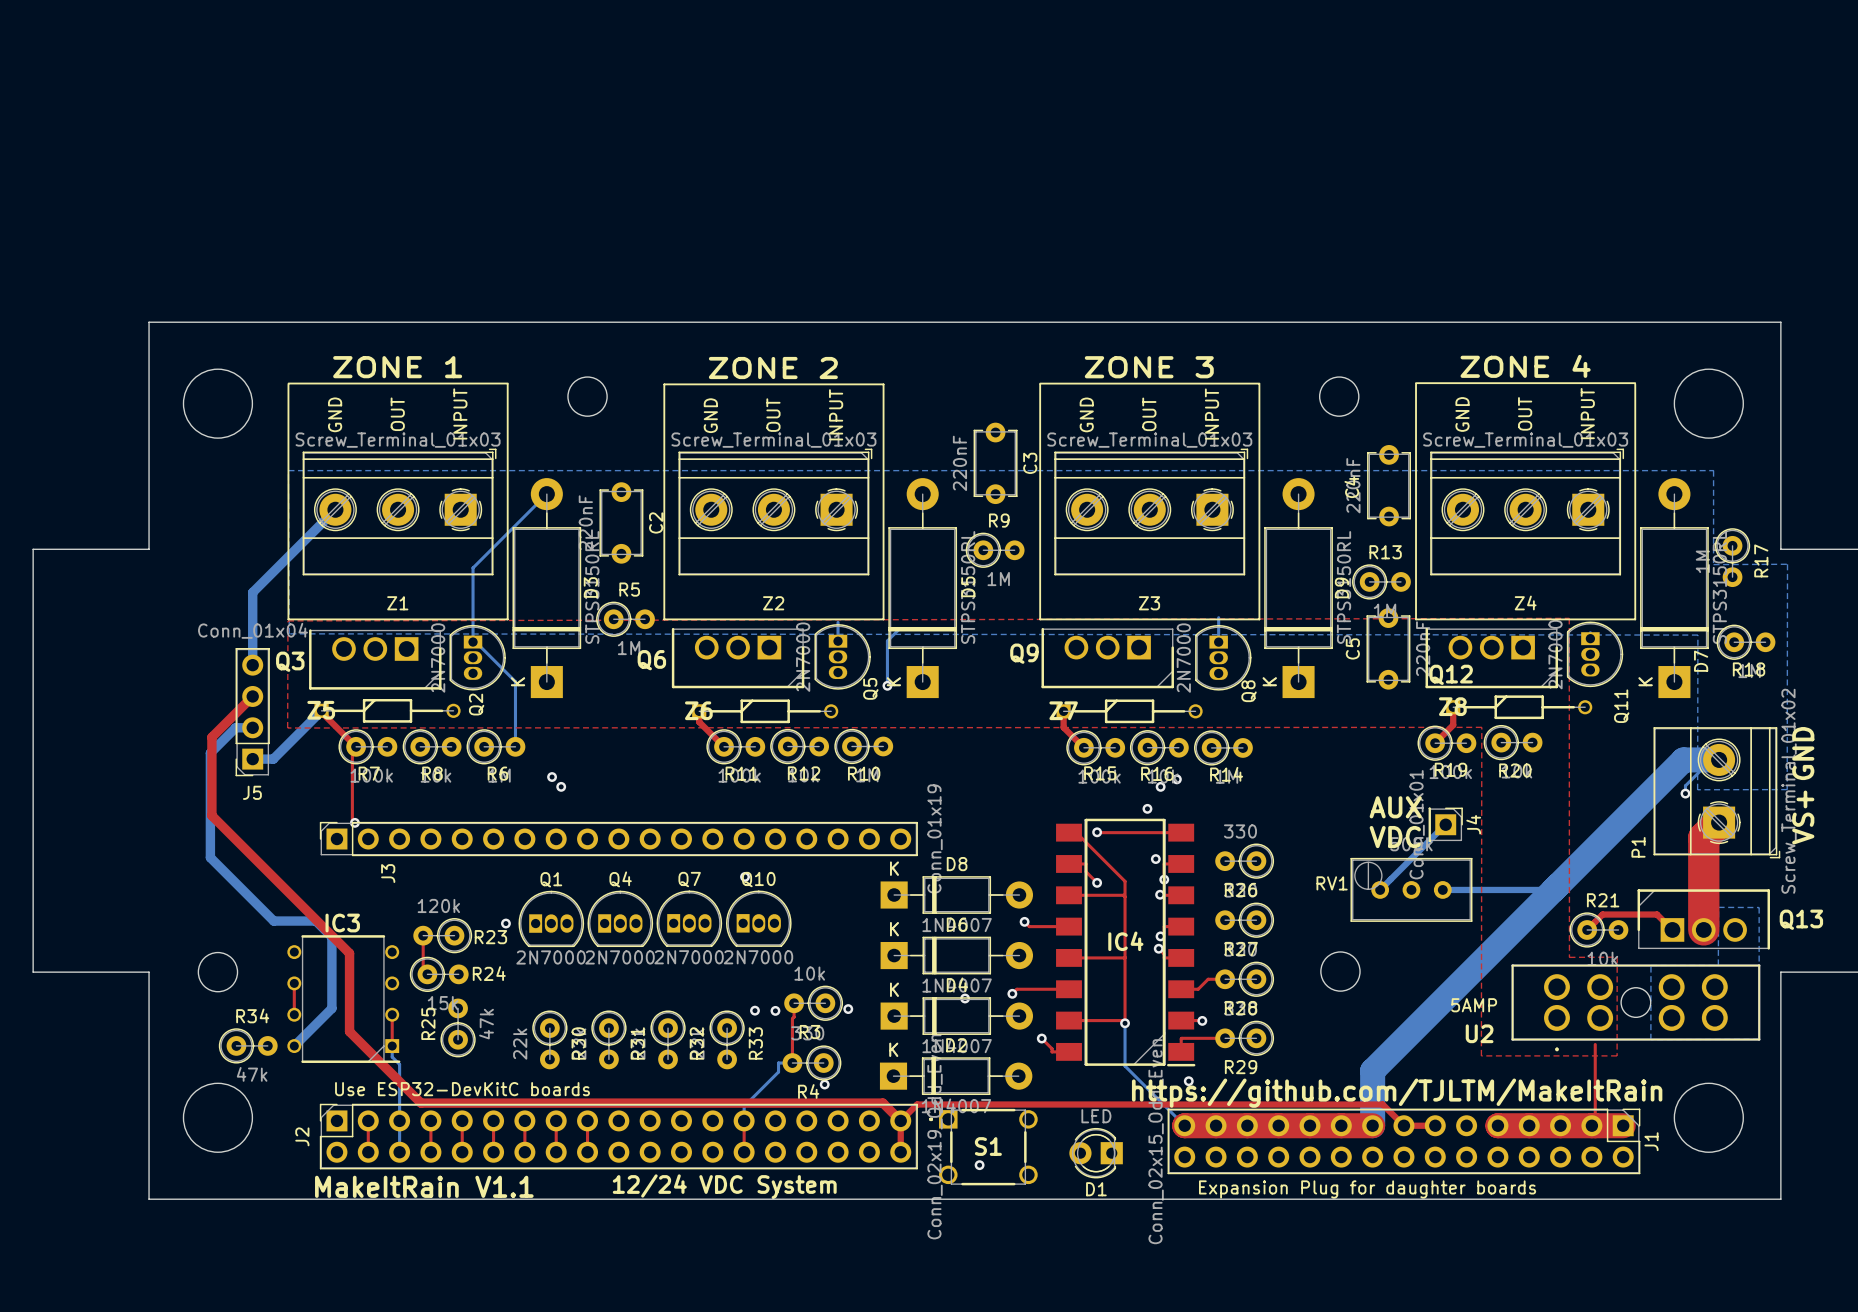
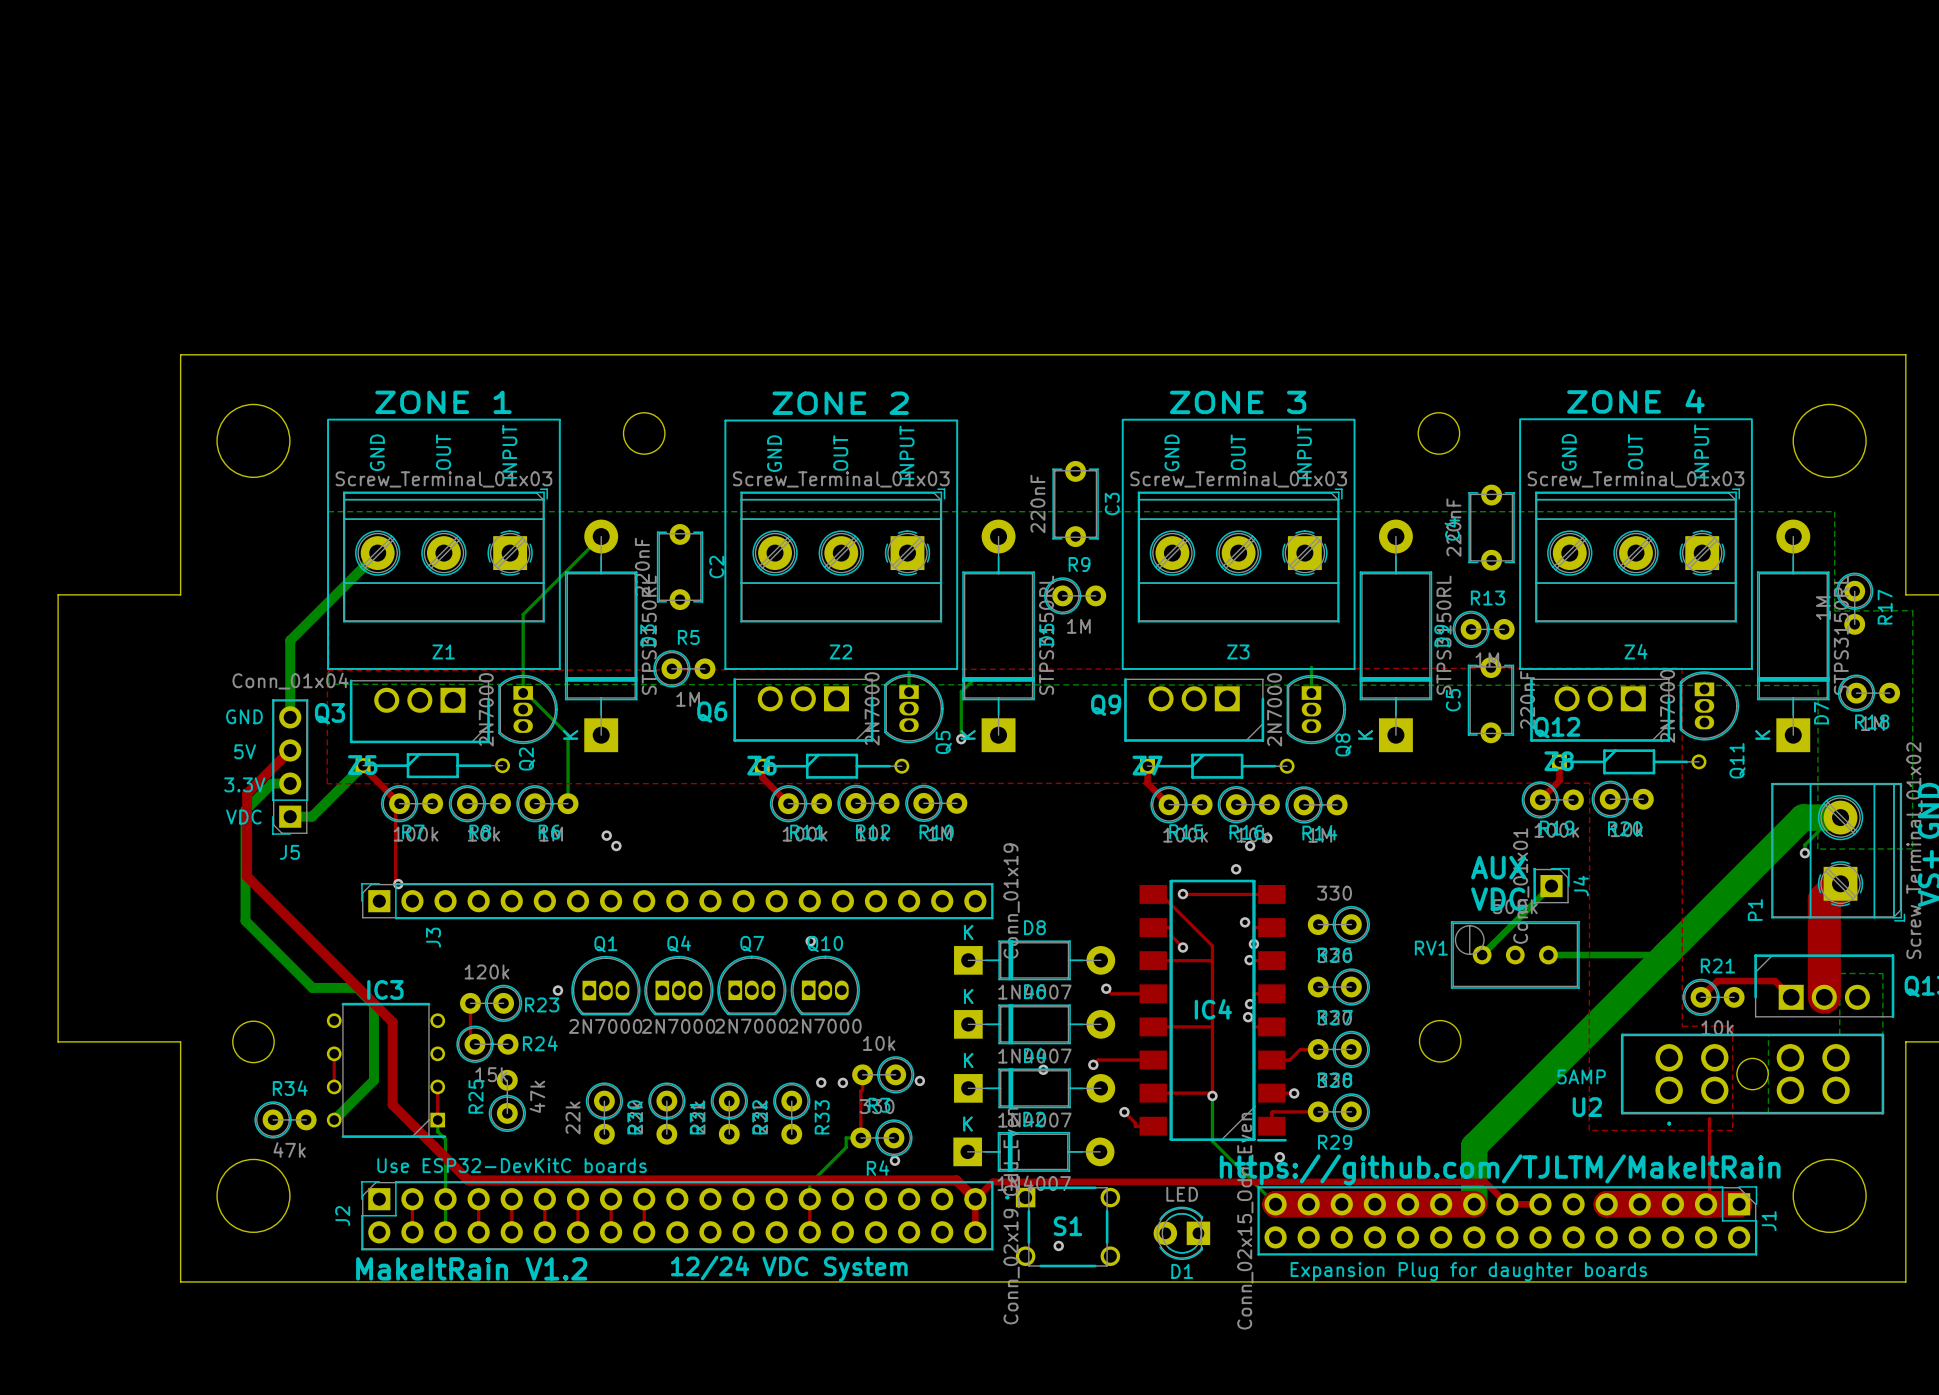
text: none -> GND (244, 716)
text: none -> 5V (245, 751)
text: none -> 3.3V (244, 784)
text: none -> VDC (243, 817)
text: MakeItRain V1.1 (424, 1186) -> MakeItRain V1.2 (471, 1268)

